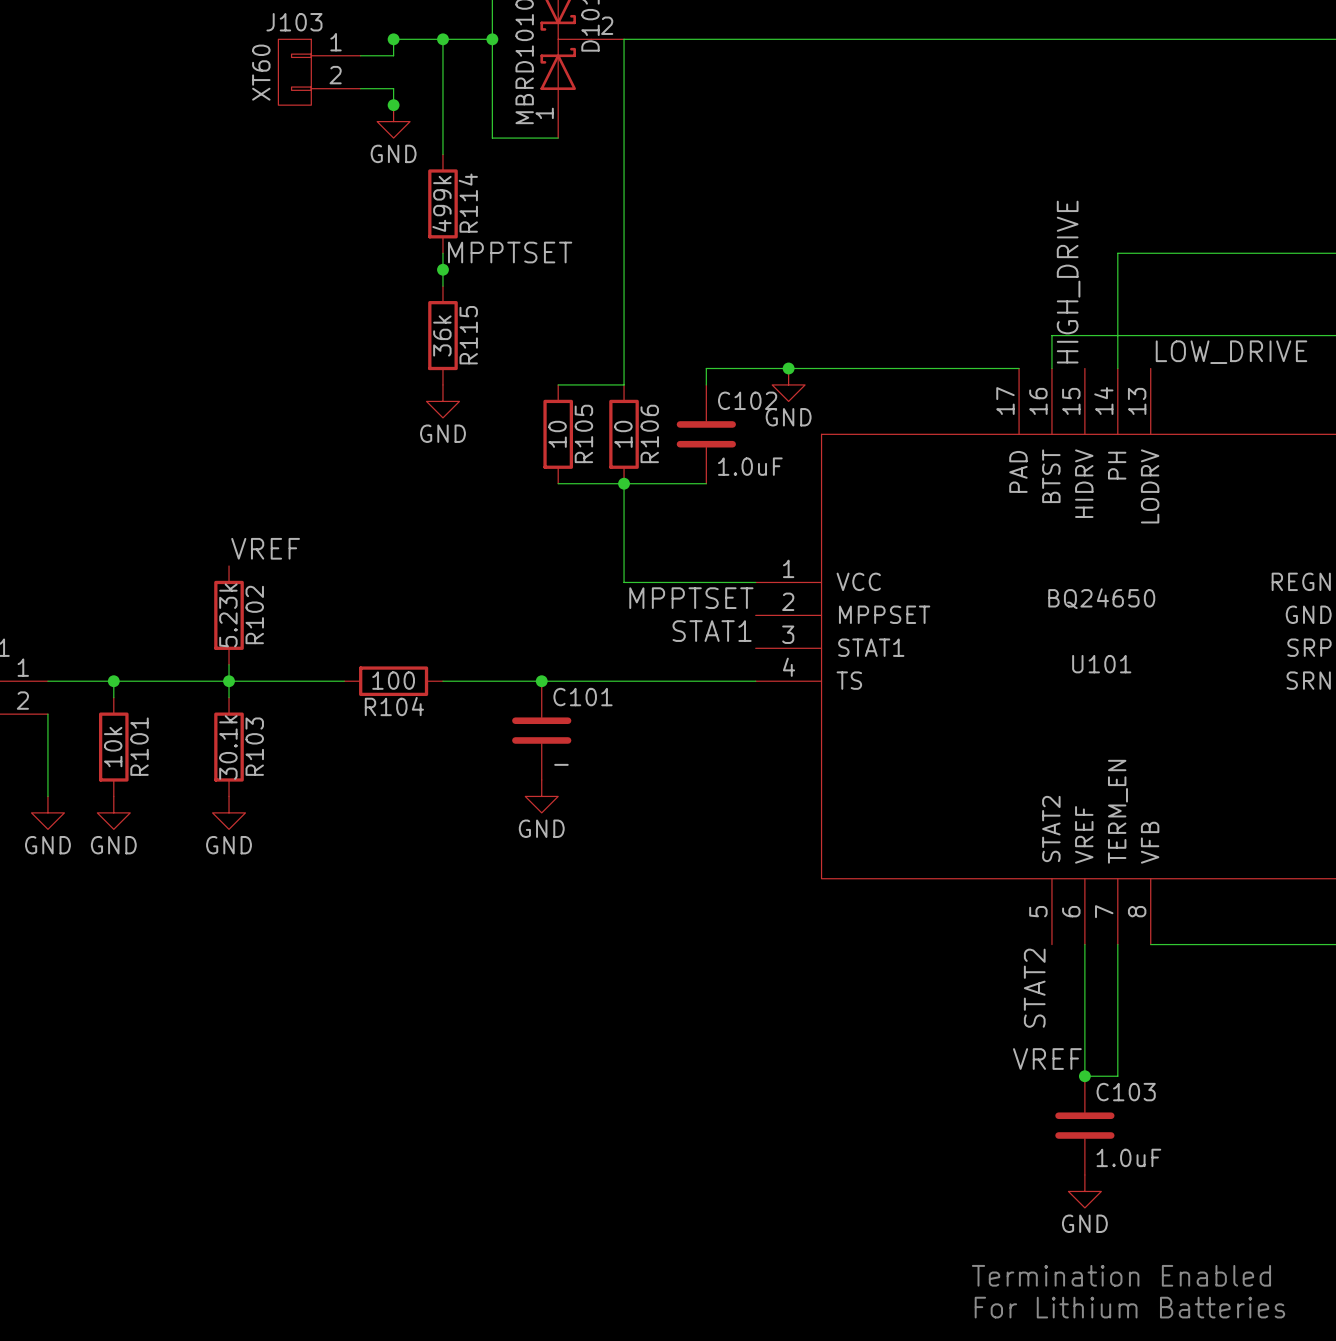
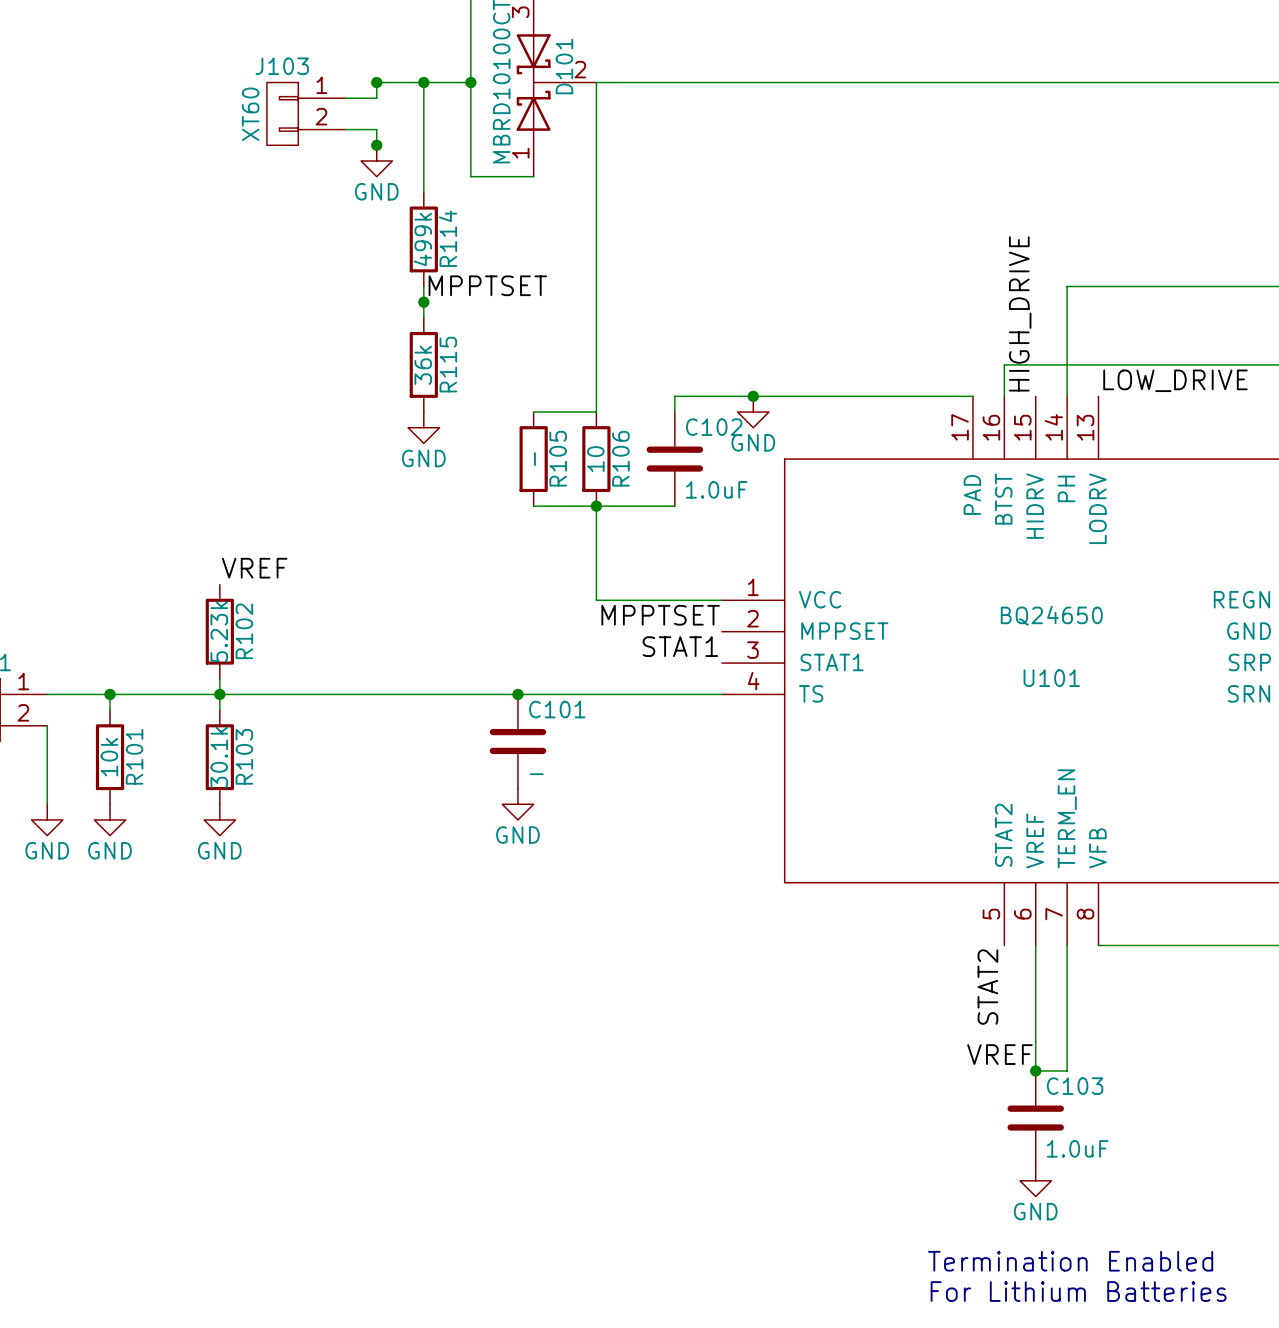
R105 value: 10 (557, 434) -> - (534, 459)
wire: none -> (329, 694) (423, 694)
R104: 100 (393, 681) -> none

